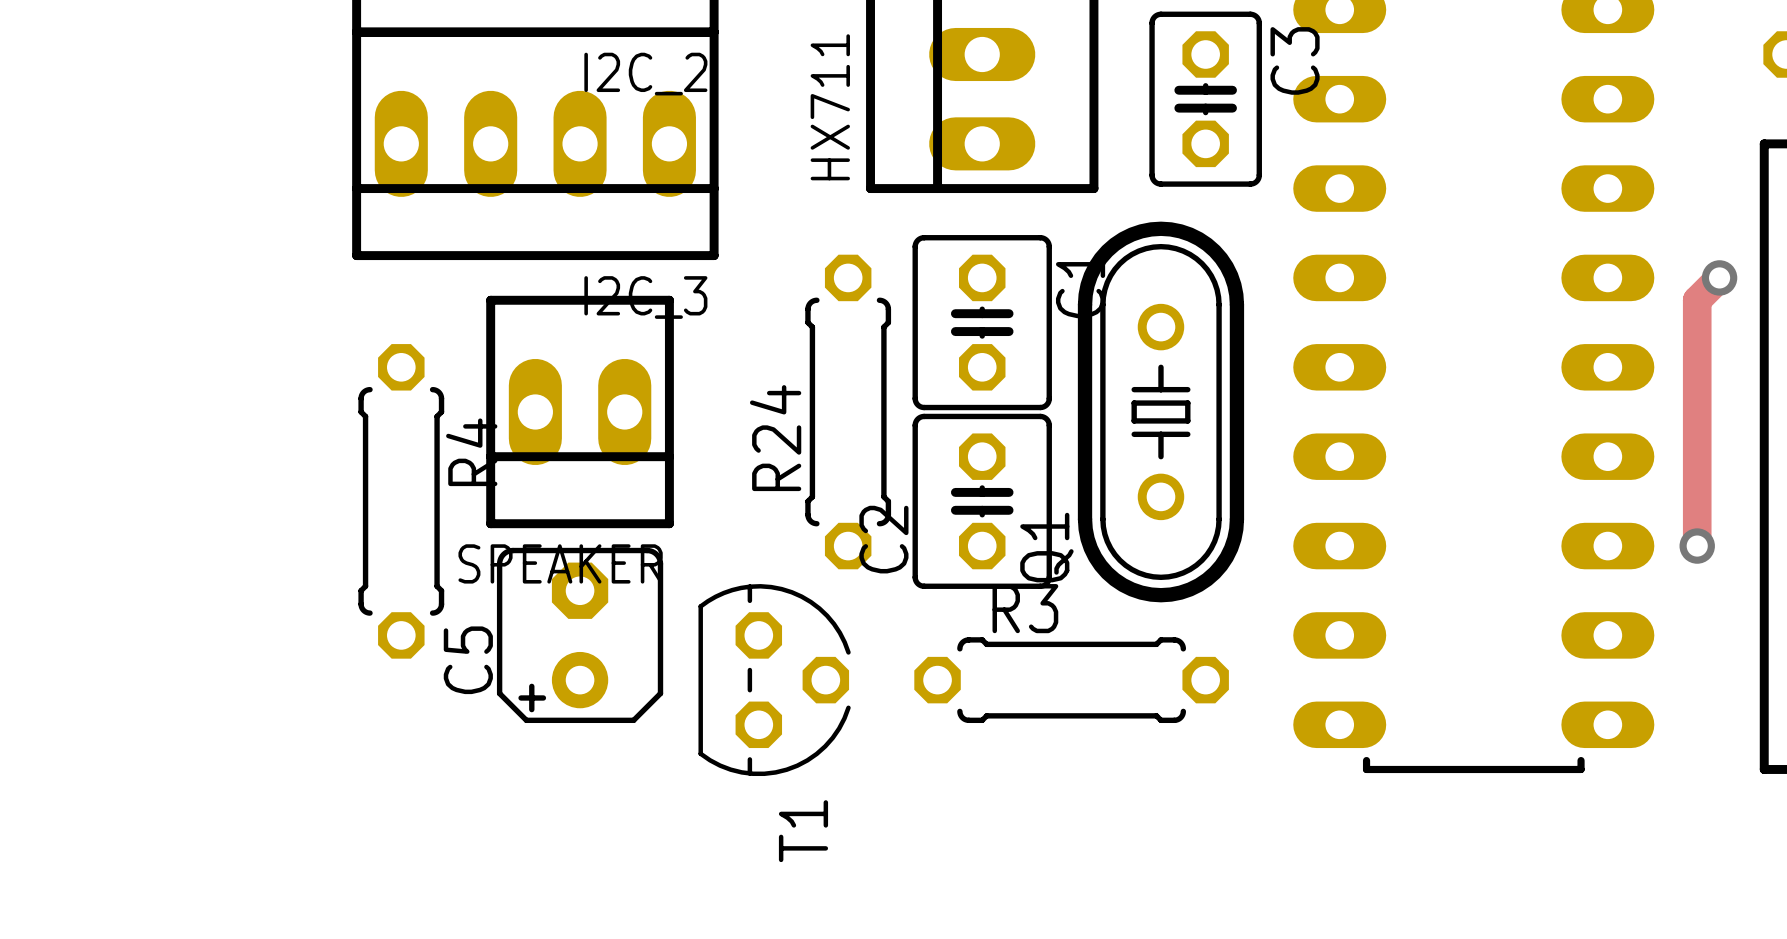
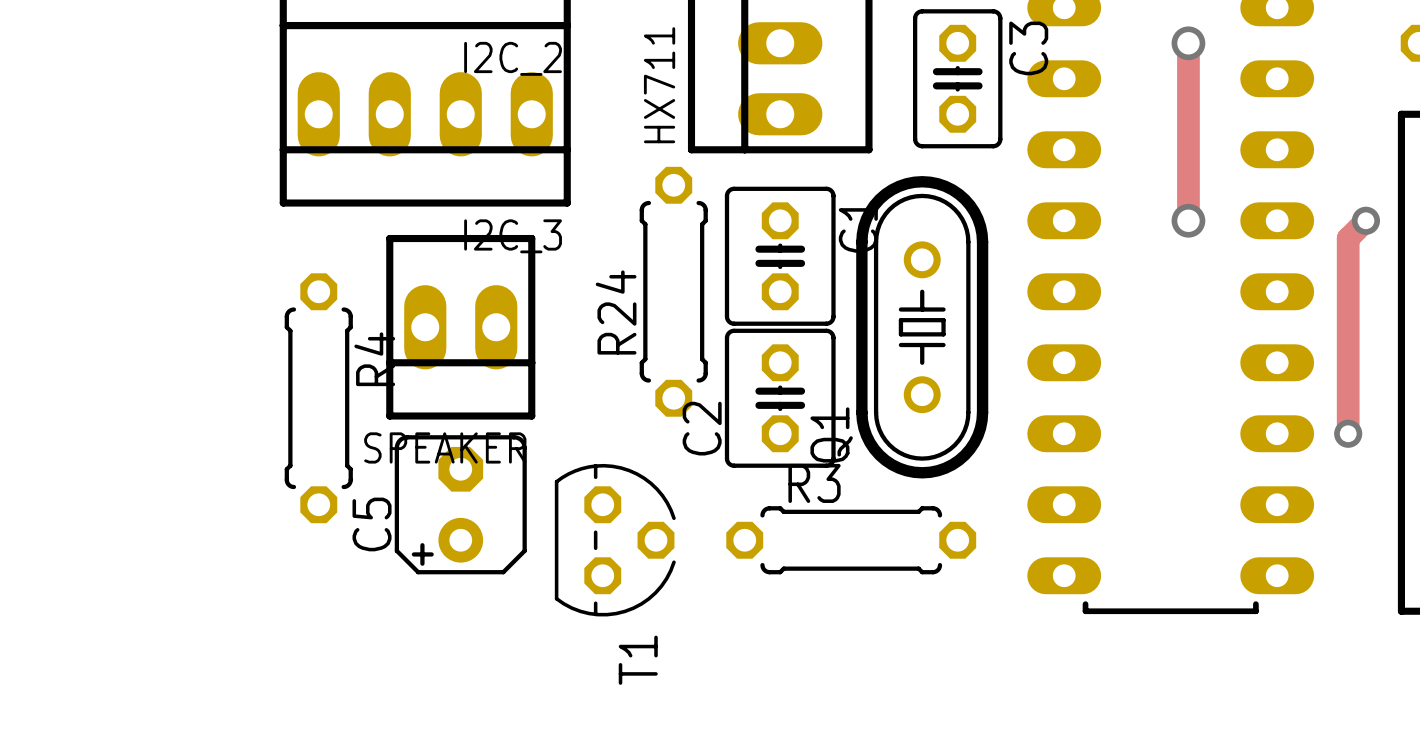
track: none -> (1188, 43) (1188, 220)
via: none -> (1188, 43)
via: none -> (1188, 220)
R24 position: (848, 411) -> (673, 291)

